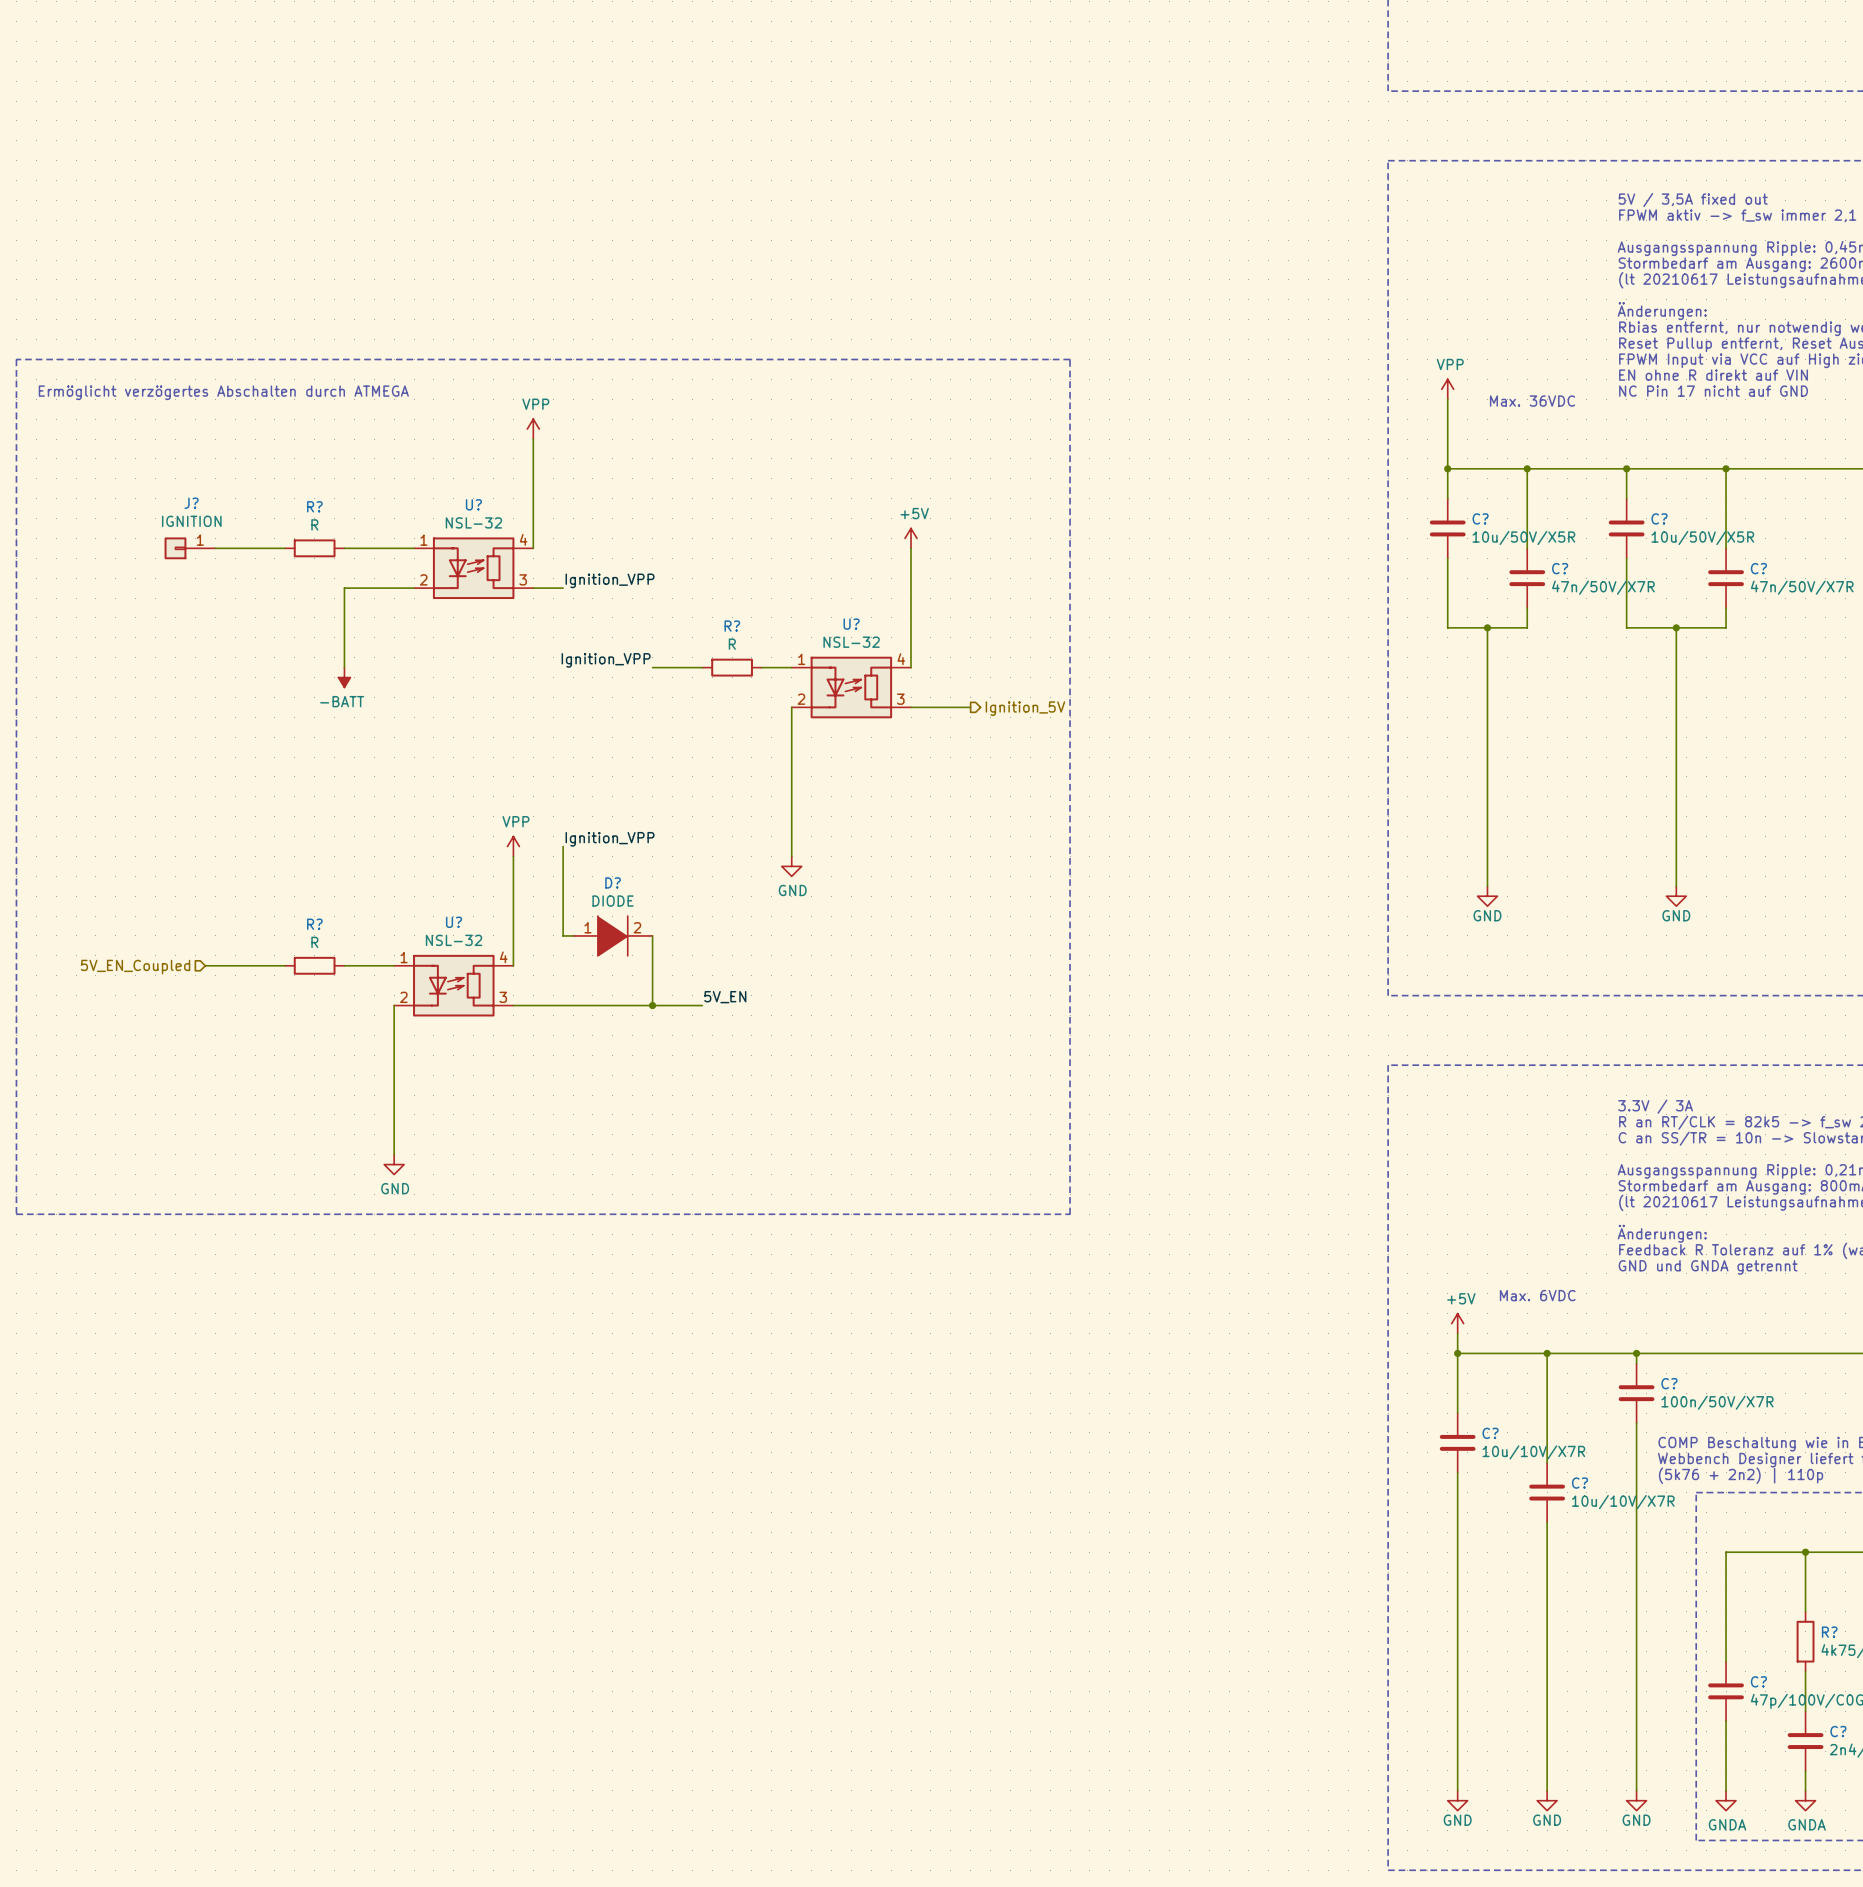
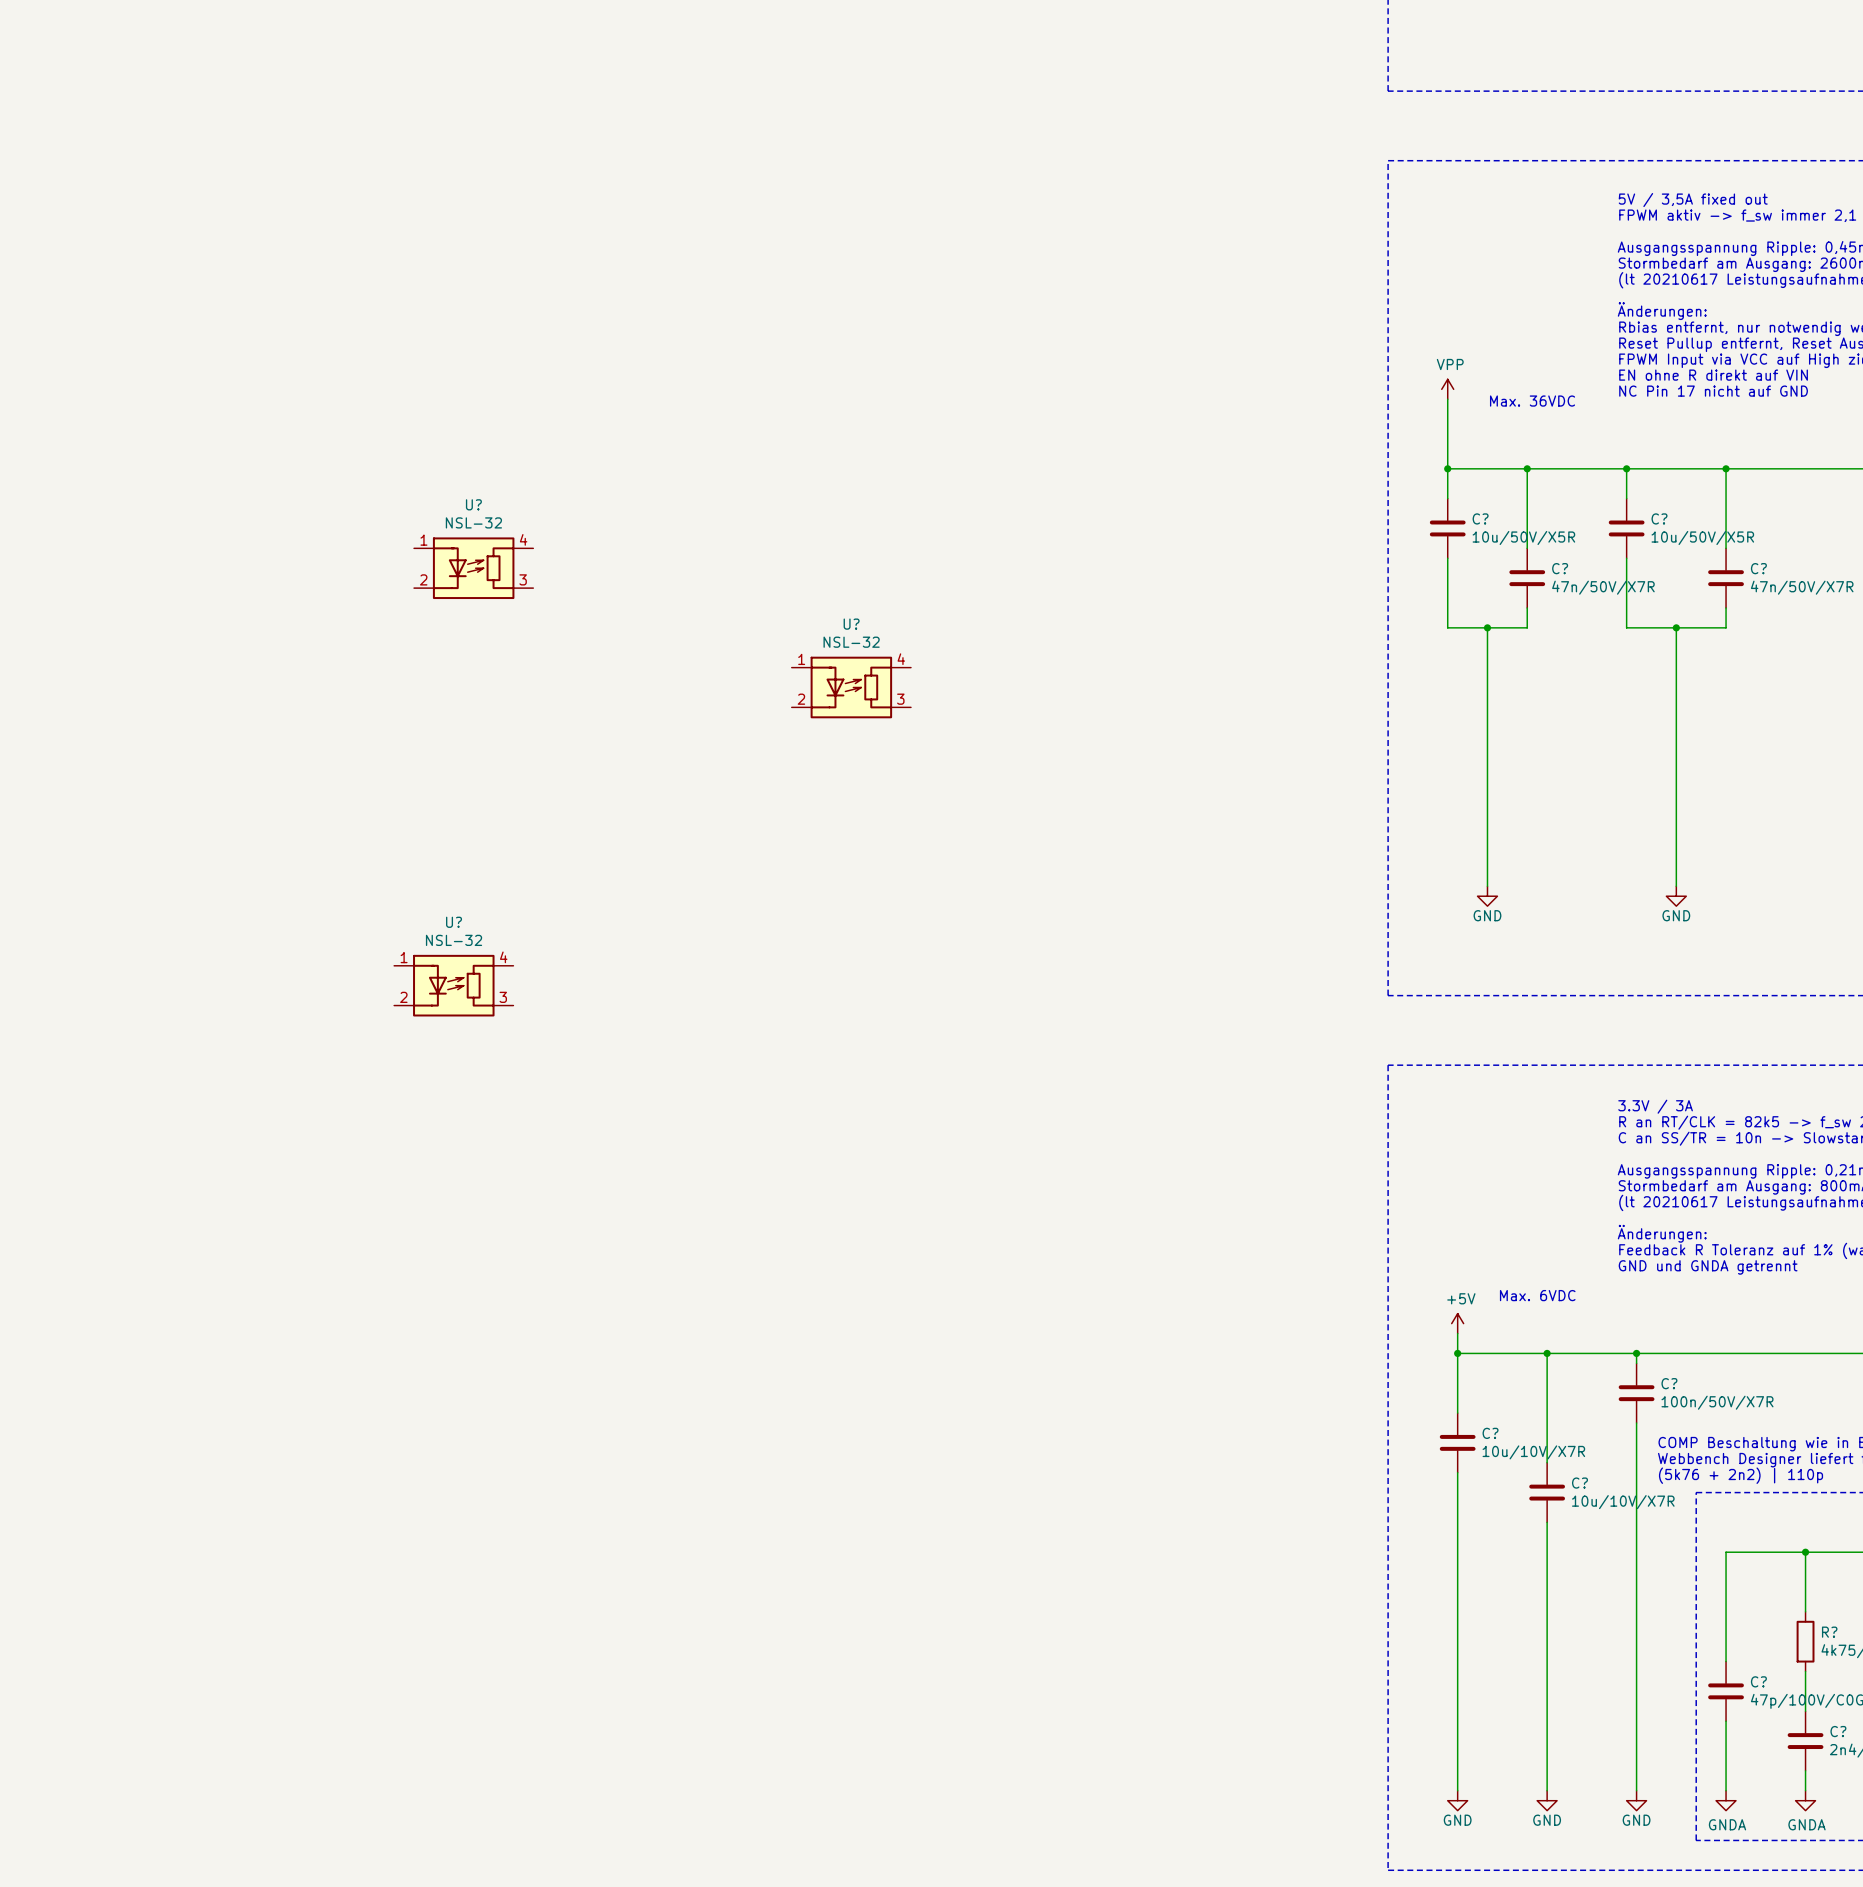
line: (16, 359) (1070, 359) (1070, 1214) (16, 1214) (16, 359) -> none
text: Ermöglicht verzögertes Abschalten durch ATMEGA (223, 392) -> none
power symbol: VPP (533, 429) -> none
wire: (533, 439) (533, 548) -> none
power symbol: +5V (911, 538) -> none
J?: IGNITION (189, 548) -> none
wire: (215, 548) (284, 548) -> none
R?: R (314, 548) -> none
wire: (344, 548) (414, 548) -> none
wire: (911, 548) (911, 667) -> none
label: Ignition_VPP (610, 580) -> none
wire: (414, 588) (344, 588) (344, 667) -> none
wire: (533, 588) (563, 588) -> none
label: Ignition_VPP (606, 660) -> none
wire: (652, 667) (702, 667) -> none
R?: R (732, 667) -> none
wire: (761, 667) (791, 667) -> none
power symbol: -BATT (344, 677) -> none
wire: (791, 707) (791, 856) -> none
wire: (911, 707) (970, 707) -> none
hierarchical label: Ignition_5V (1025, 708) -> none
label: Ignition_VPP (610, 839) -> none
power symbol: VPP (513, 846) -> none
wire: (563, 846) (563, 935) (573, 935) -> none
wire: (513, 856) (513, 965) -> none
power symbol: GND (791, 866) -> none
D?: DIODE (612, 935) -> none
wire: (652, 935) (652, 1005) -> none
wire: (205, 965) (284, 965) -> none
R?: R (314, 965) -> none
wire: (344, 965) (394, 965) -> none
hierarchical label: 5V_EN_Coupled (135, 967) -> none
label: 5V_EN (725, 997) -> none
wire: (394, 1005) (394, 1154) -> none
wire: (513, 1005) (702, 1005) -> none
junction: (652, 1005) -> none
power symbol: GND (394, 1164) -> none

